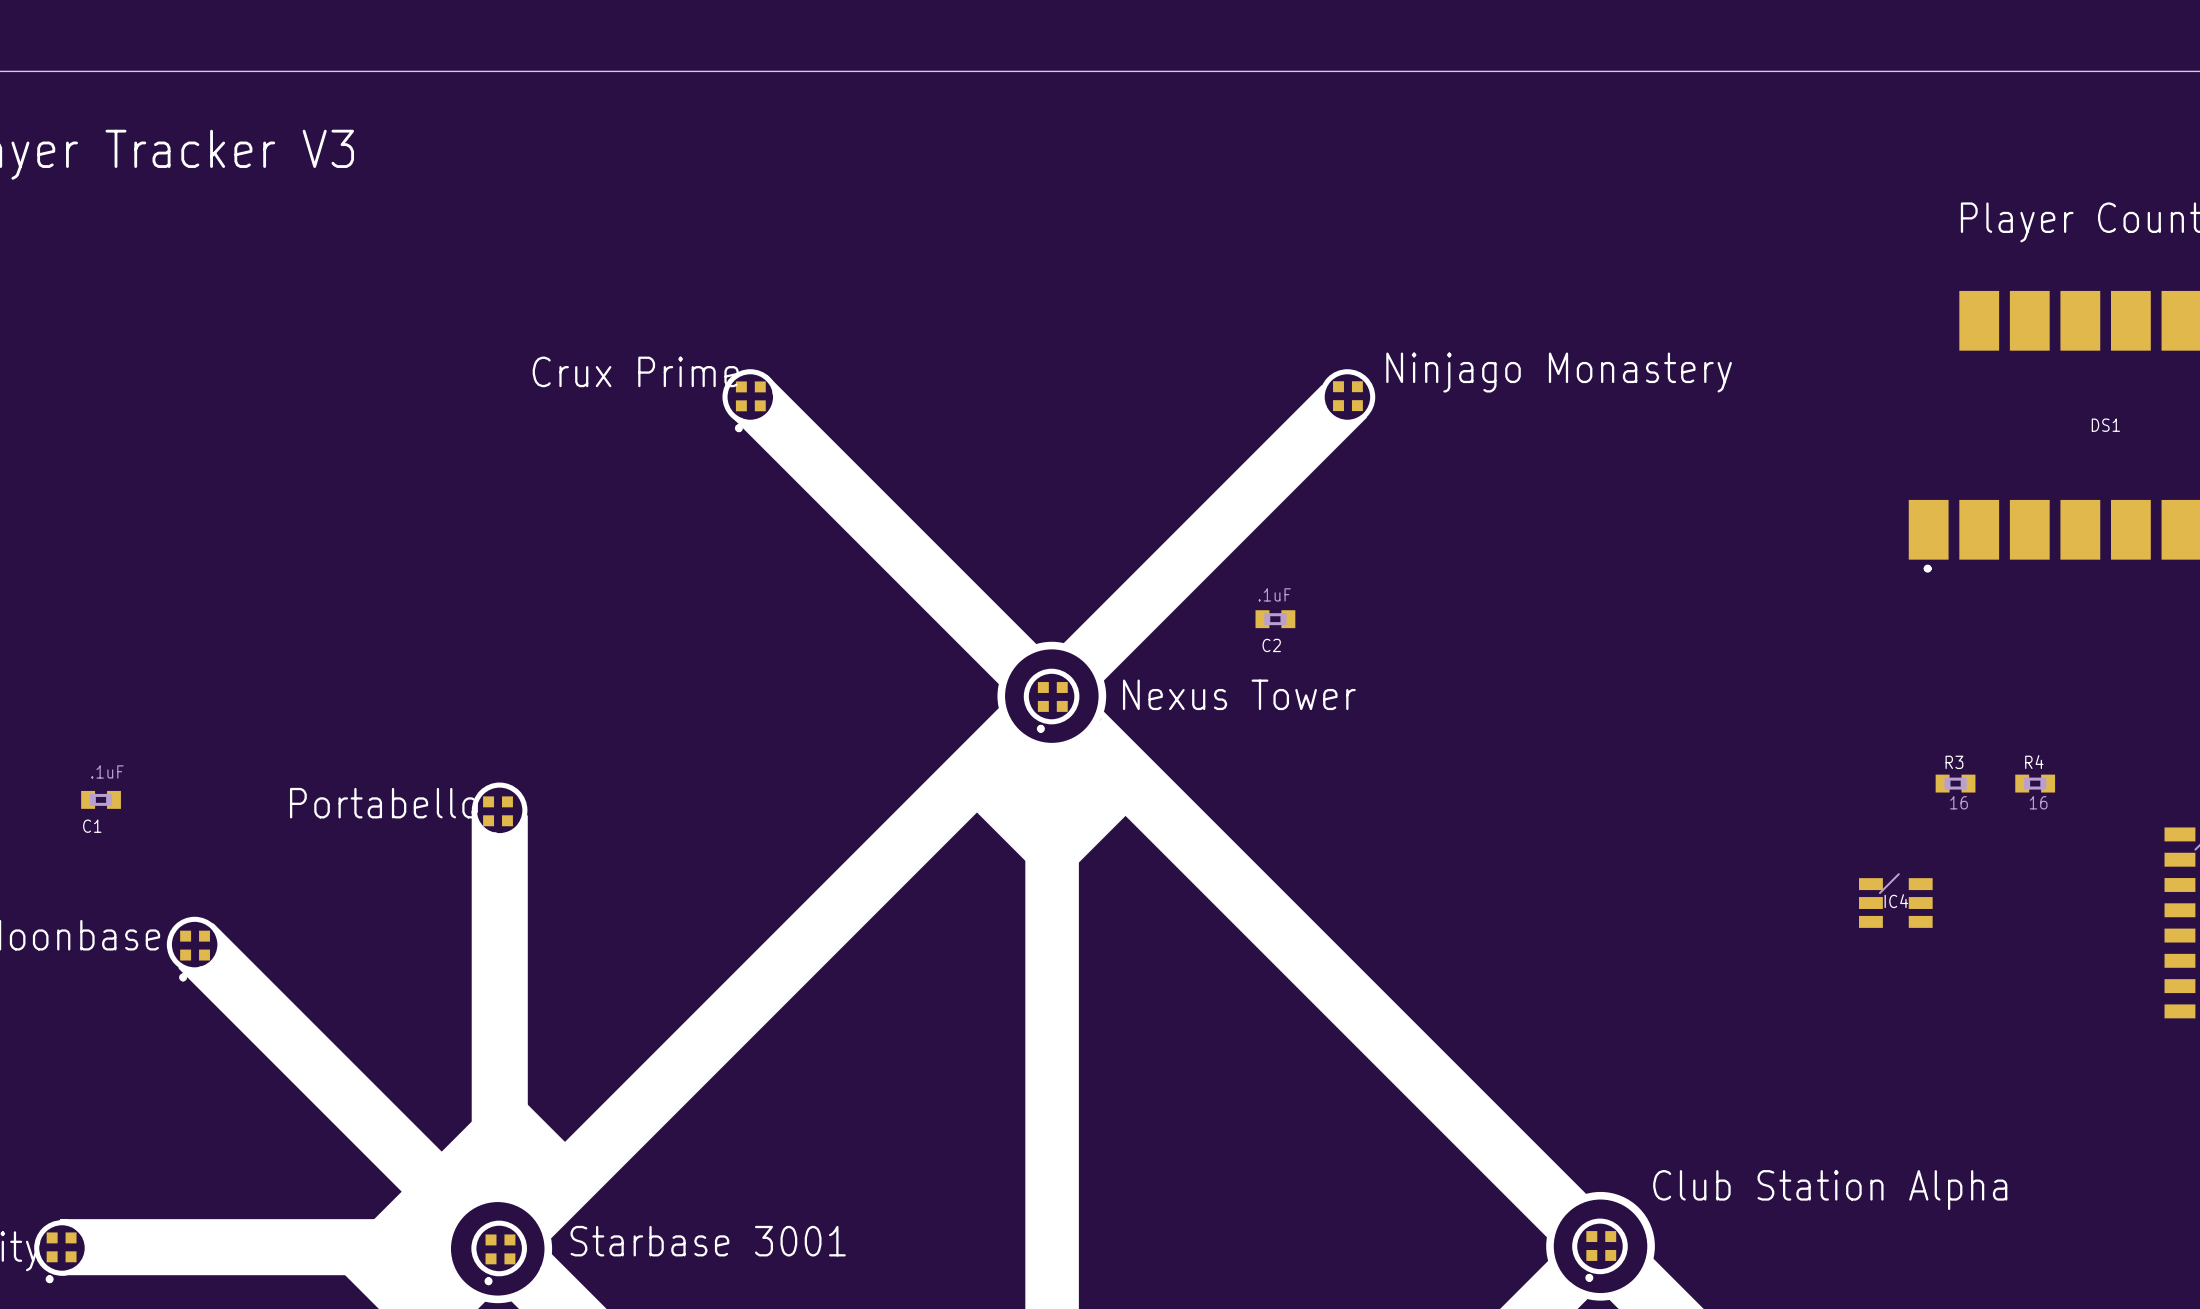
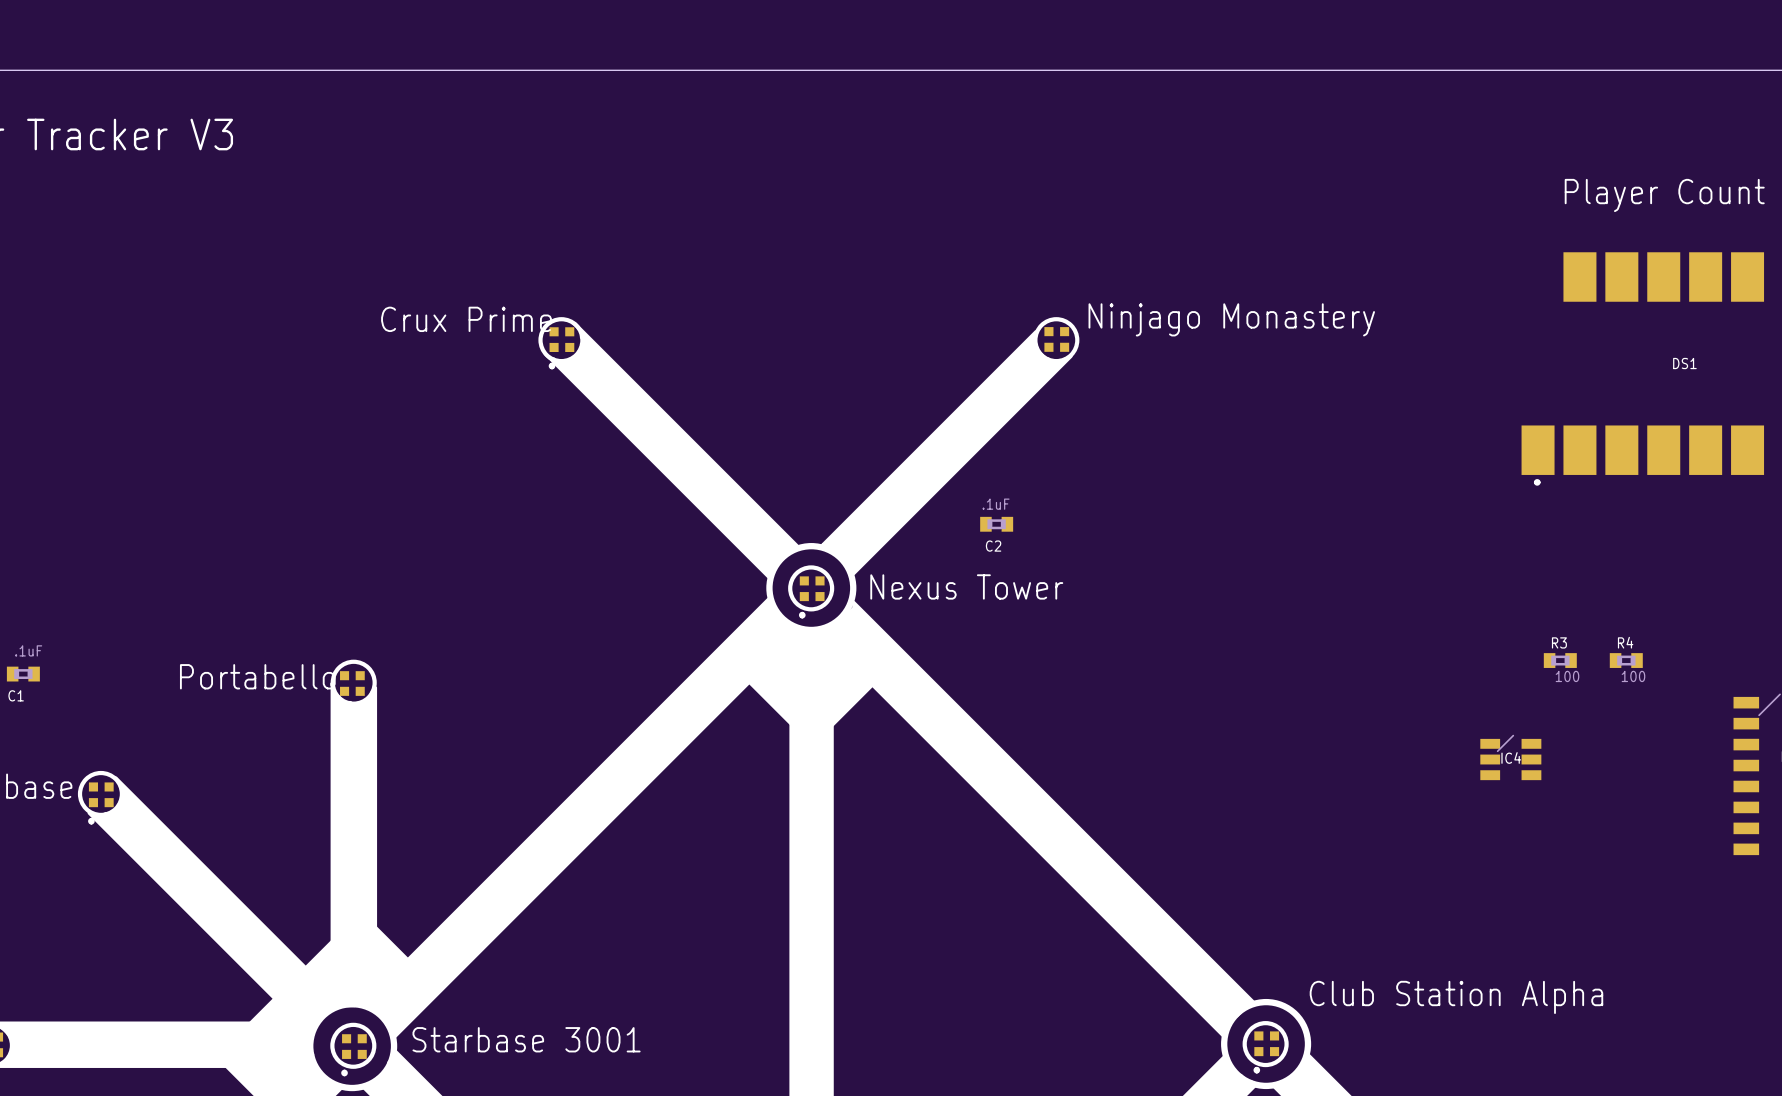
R3 value: 16 (1959, 802) -> 100 (1567, 676)
R4 value: 16 (2038, 802) -> 100 (1633, 676)

